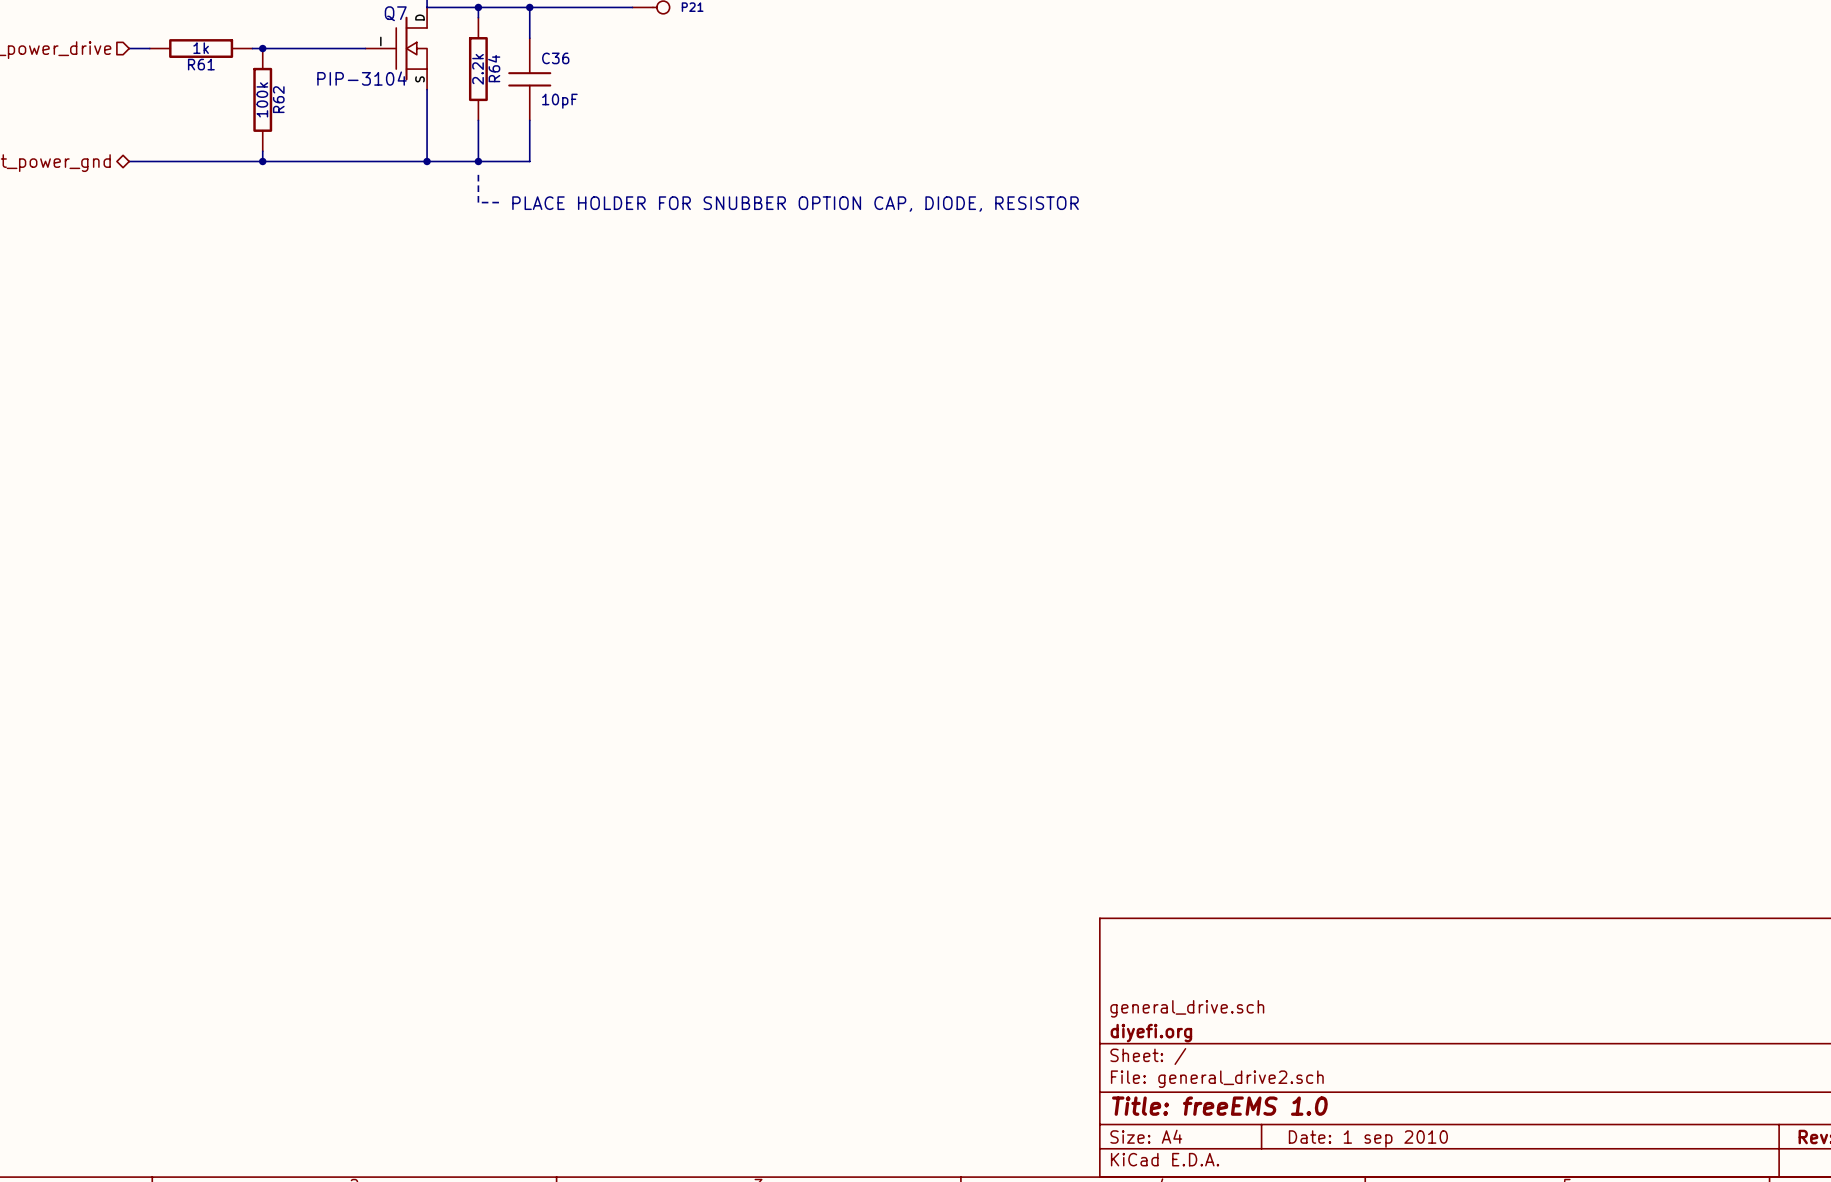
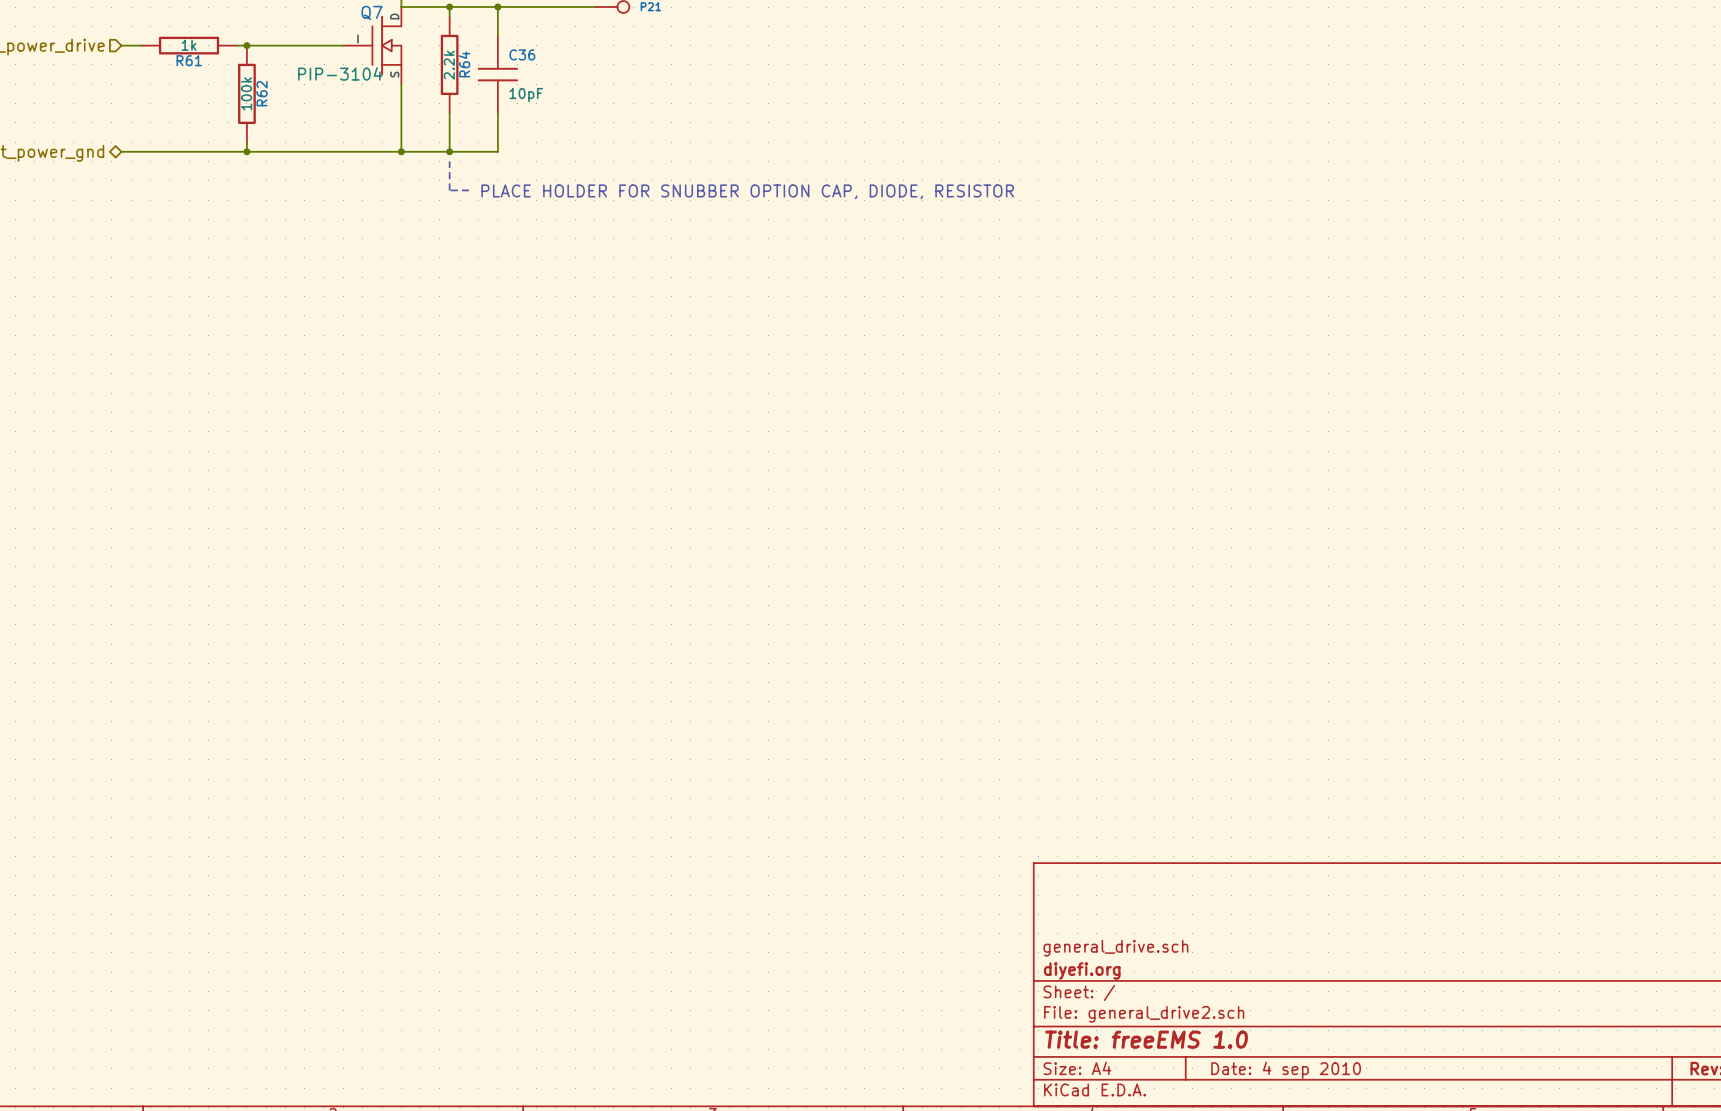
title block: Date: 1 sep 2010 (1368, 1139) -> Date: 4 sep 2010 (1286, 1070)

